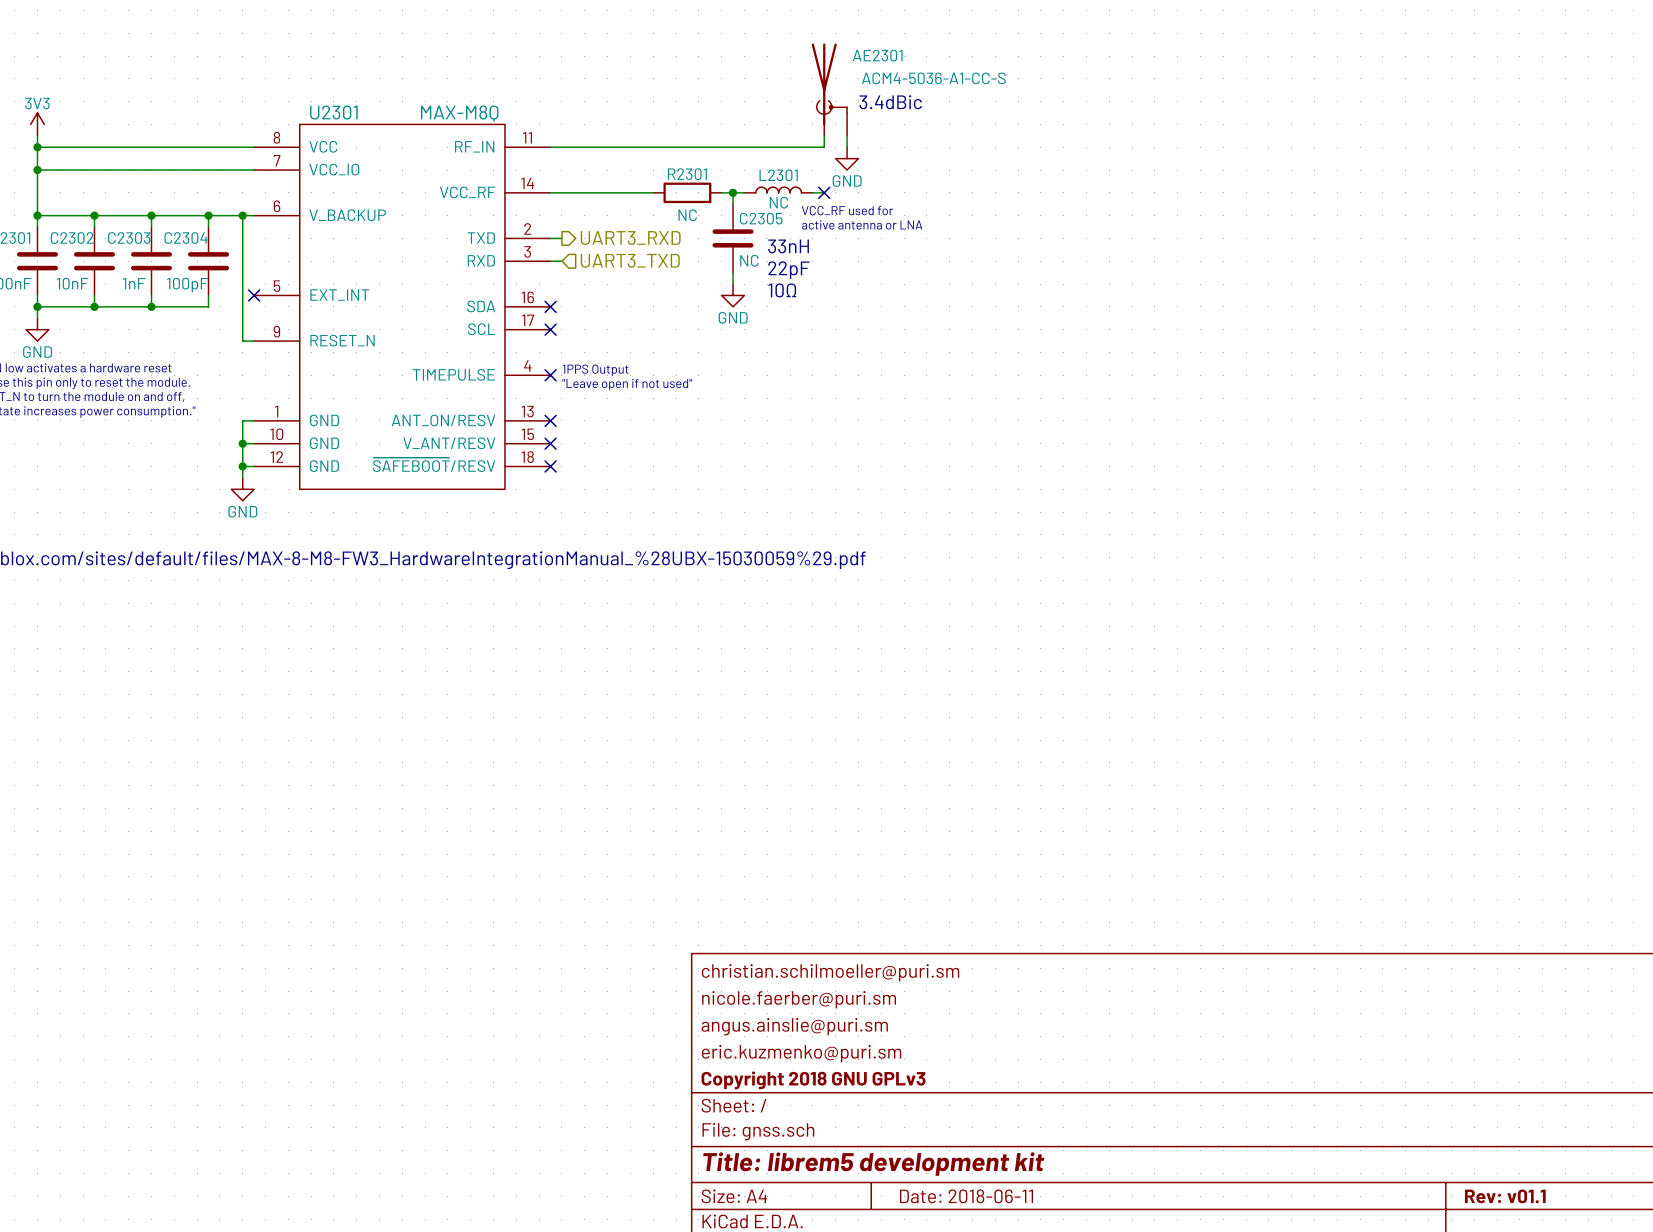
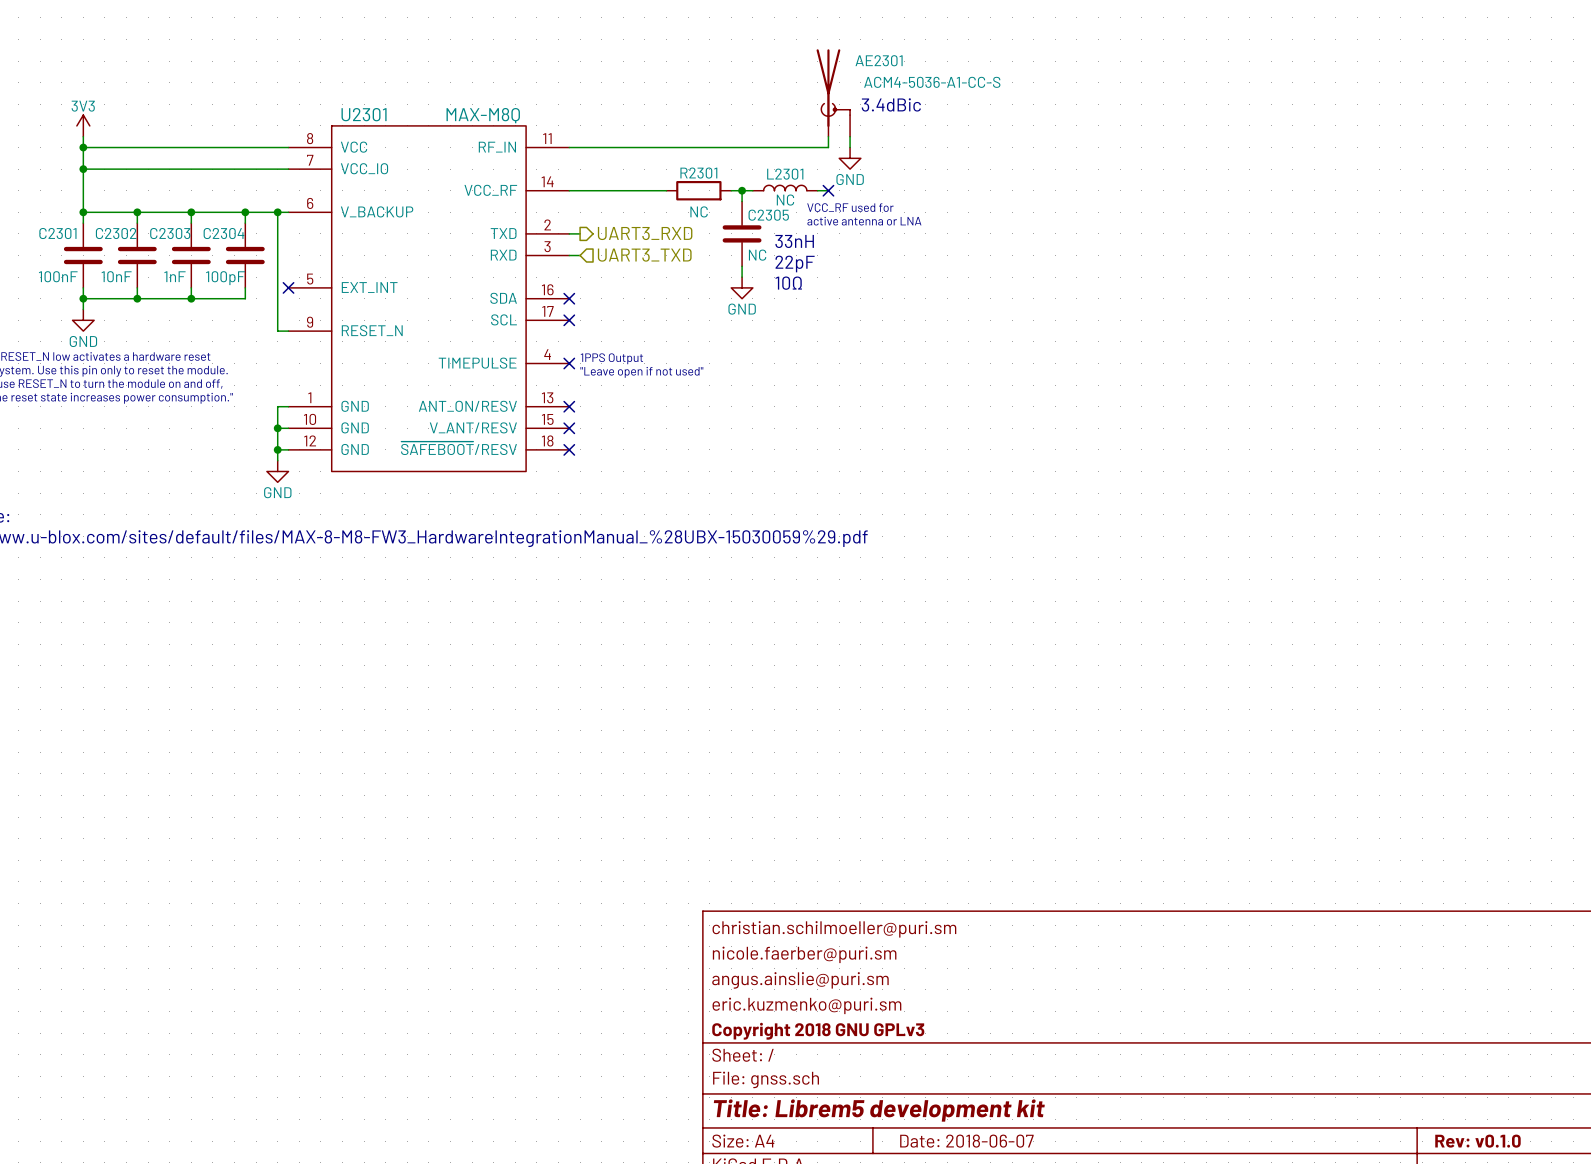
title block: Title: librem5 development kit (873, 1164) -> Title: Librem5 development kit (879, 1110)
title block: Date: 2018-06-11 (966, 1196) -> Date: 2018-06-07 (966, 1141)
title block: Rev: v01.1 (1505, 1196) -> Rev: v0.1.0 (1477, 1141)

